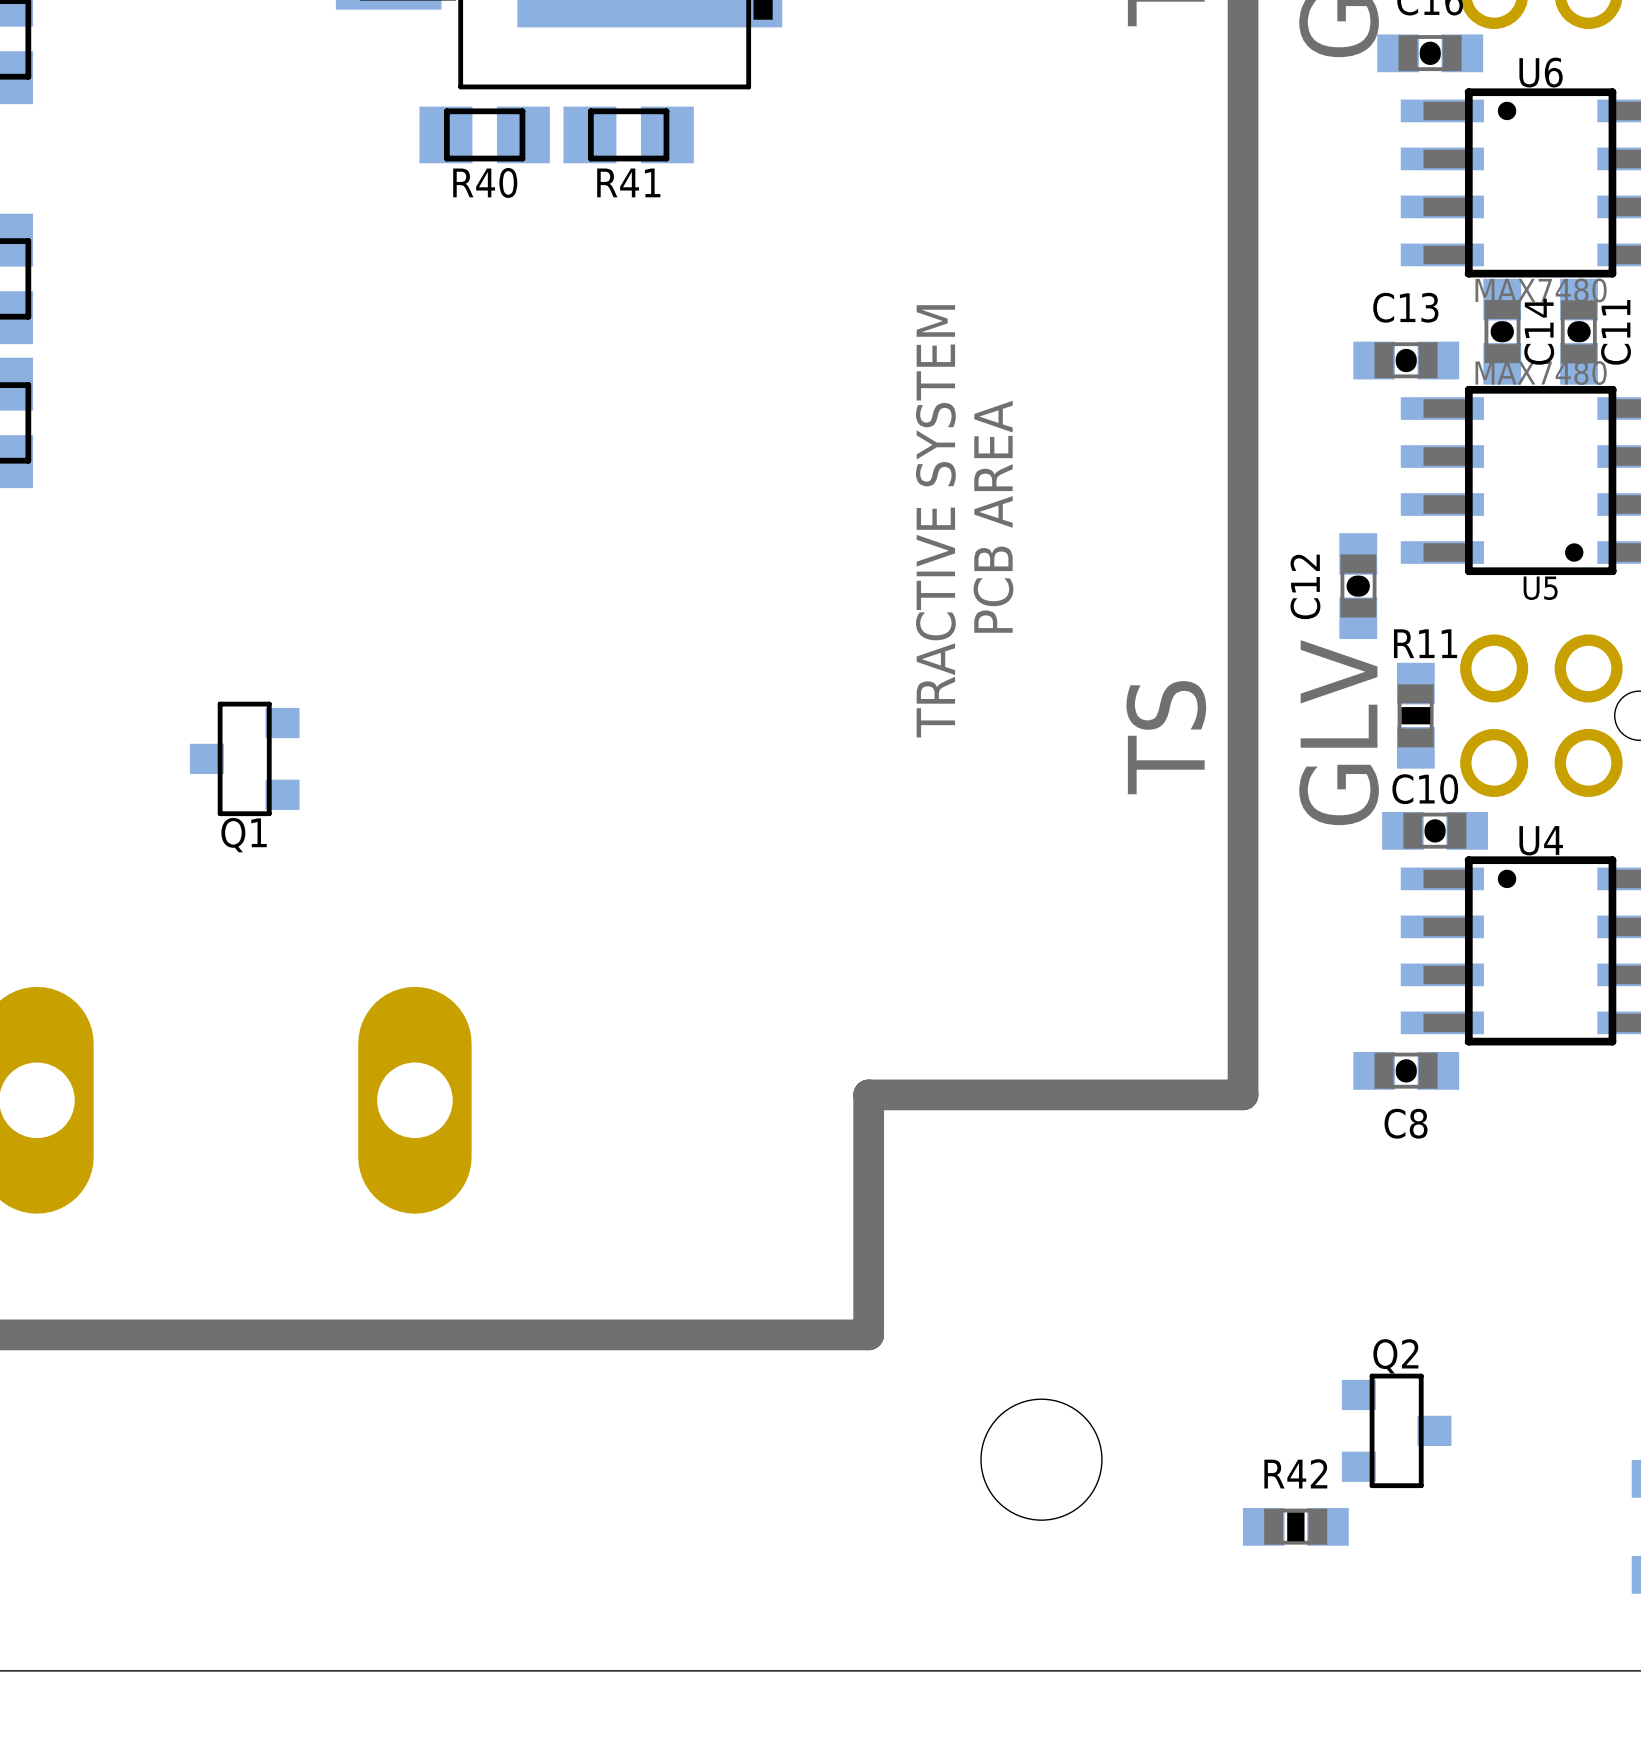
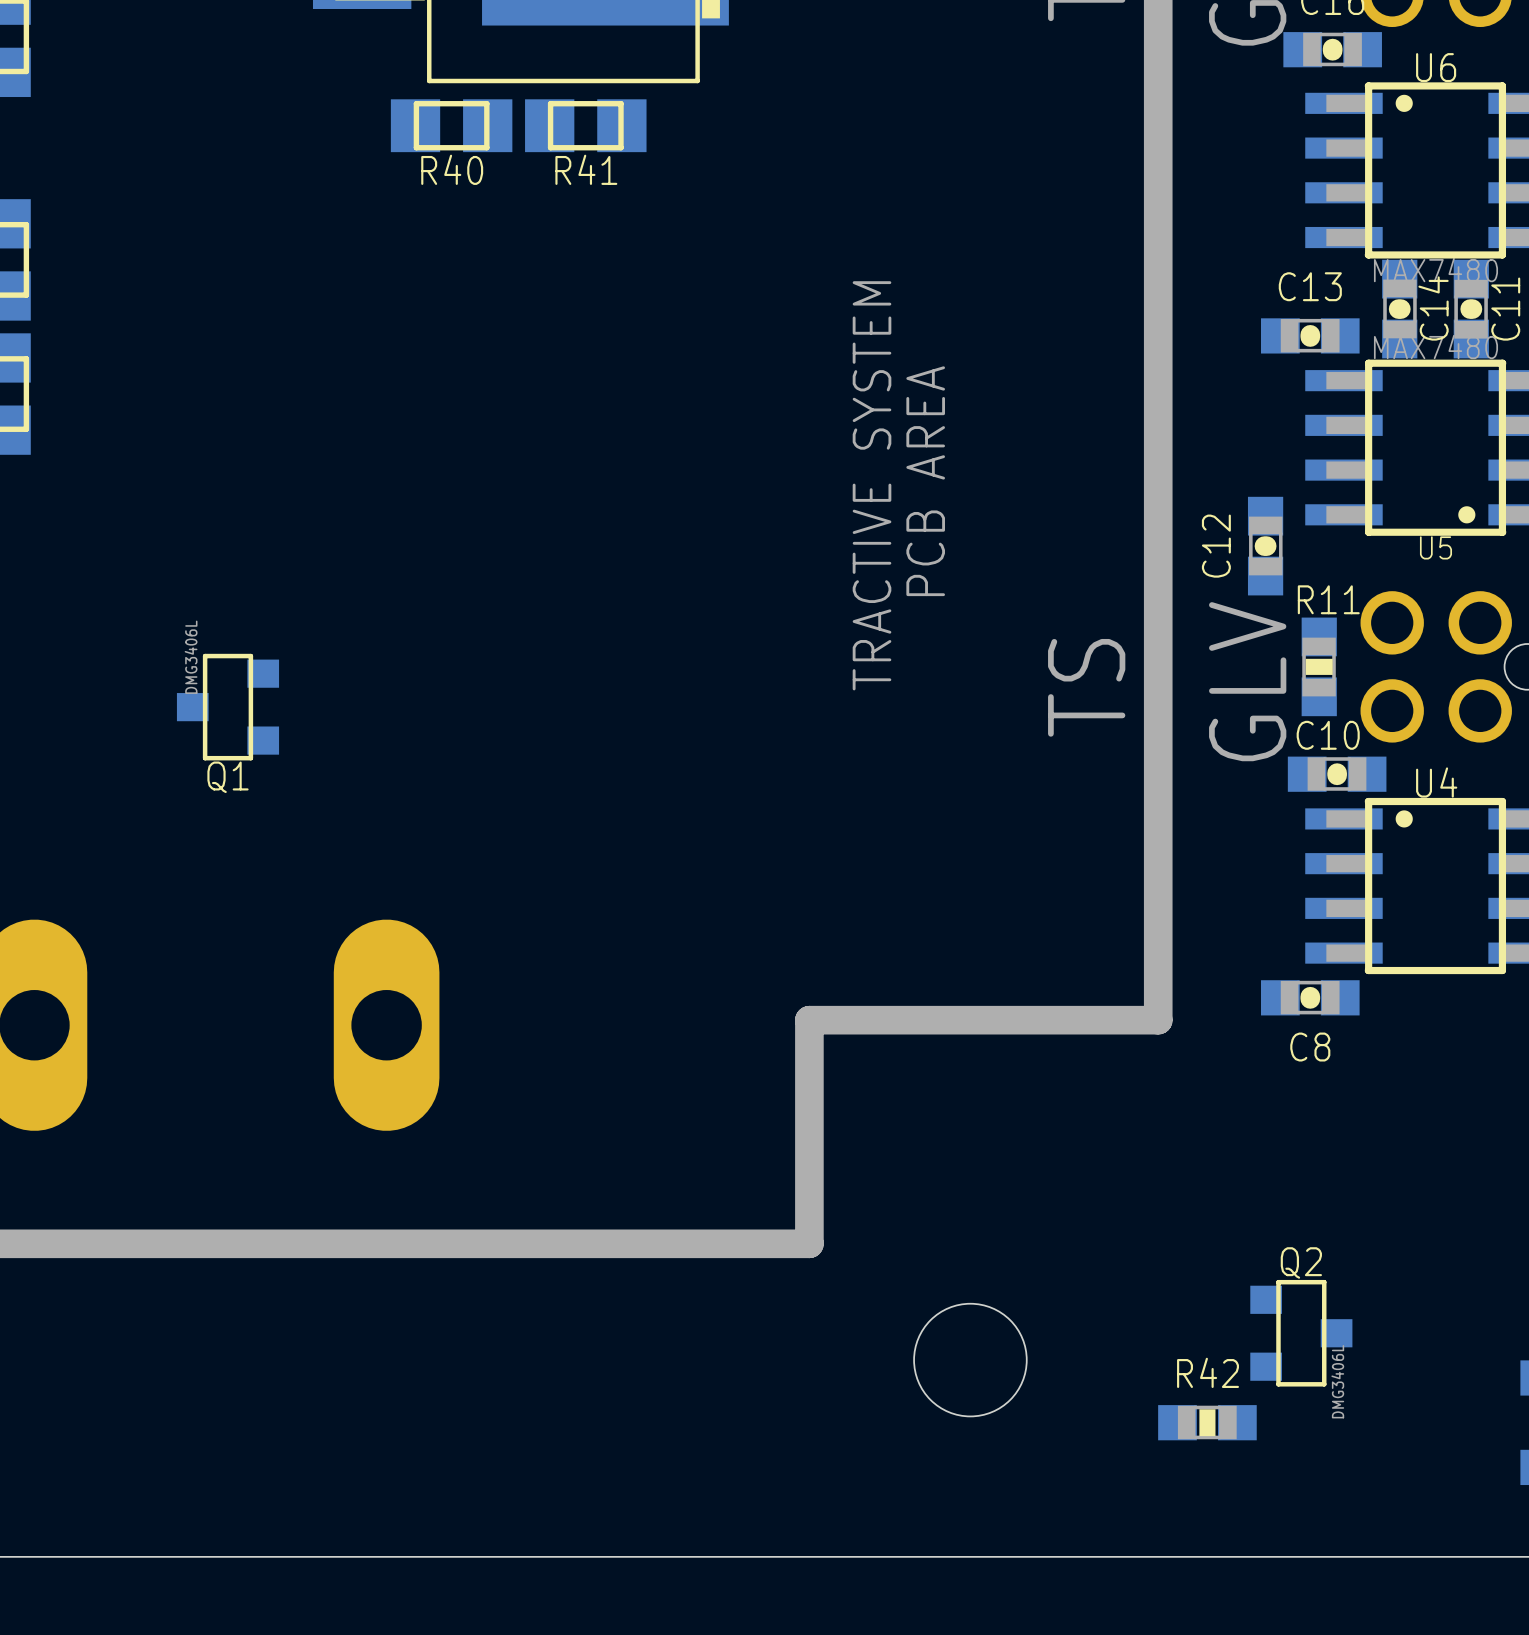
Q1 value: none -> DMG3406L (191, 657)
Q2 value: none -> DMG3406L (1337, 1381)

